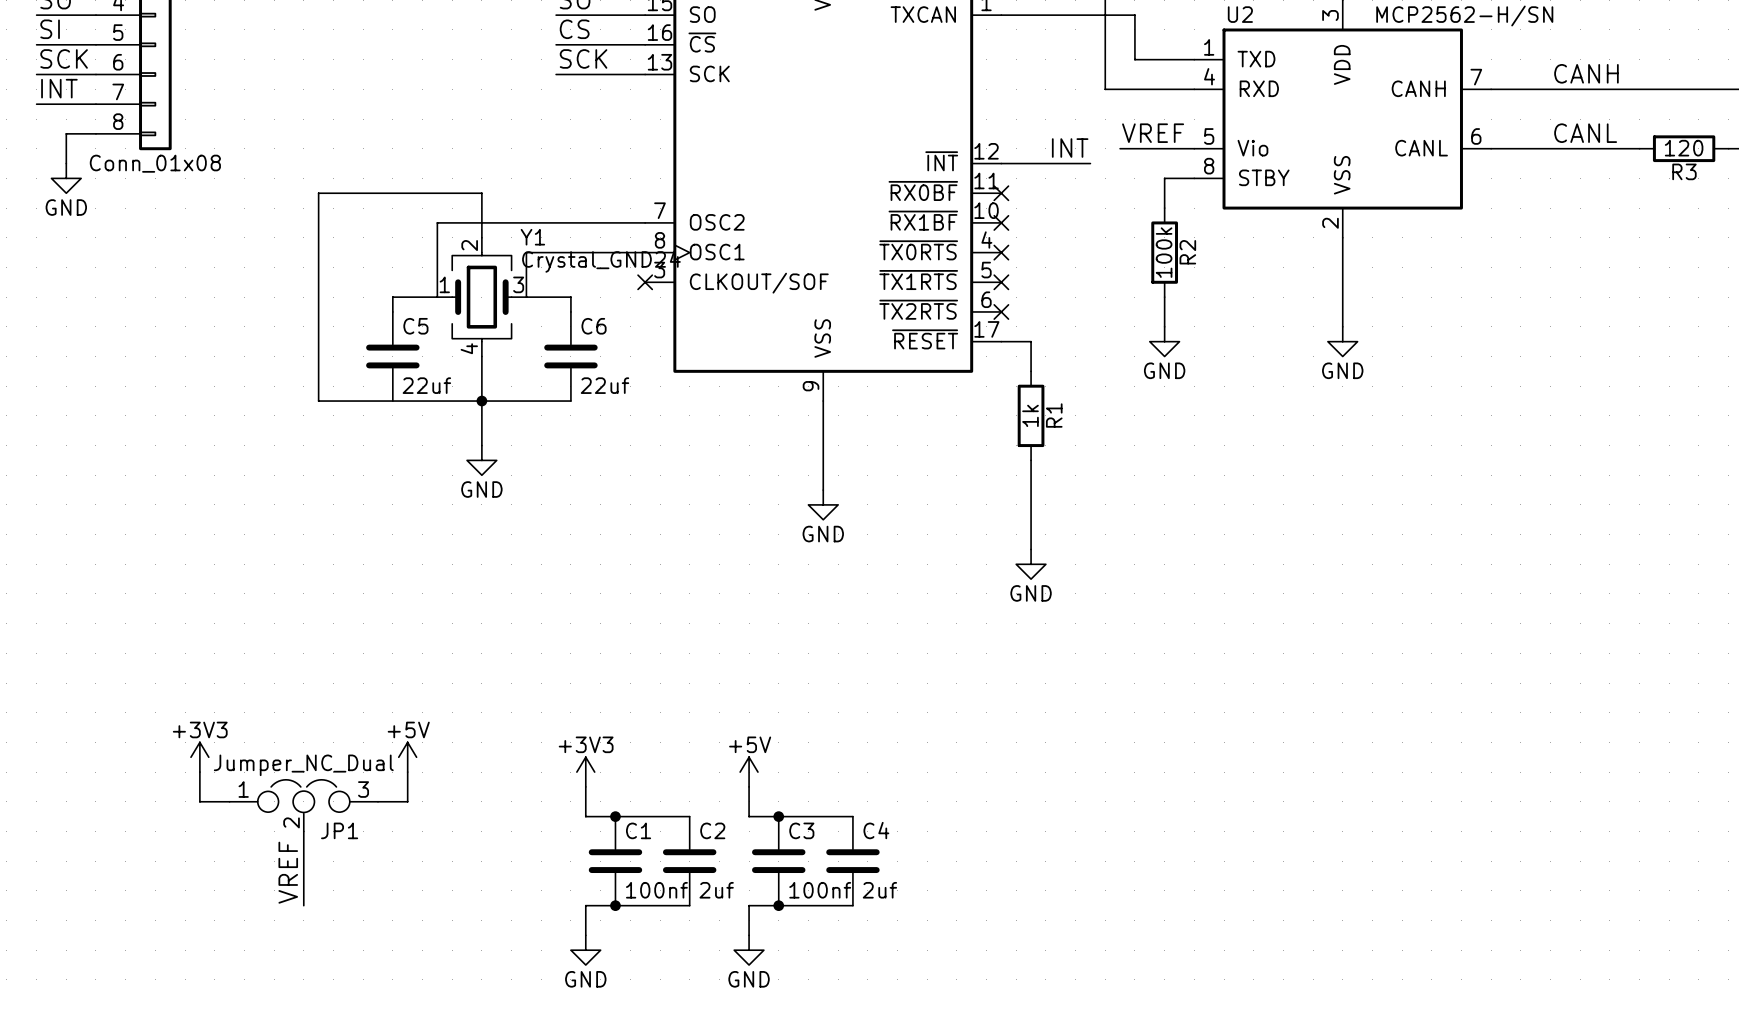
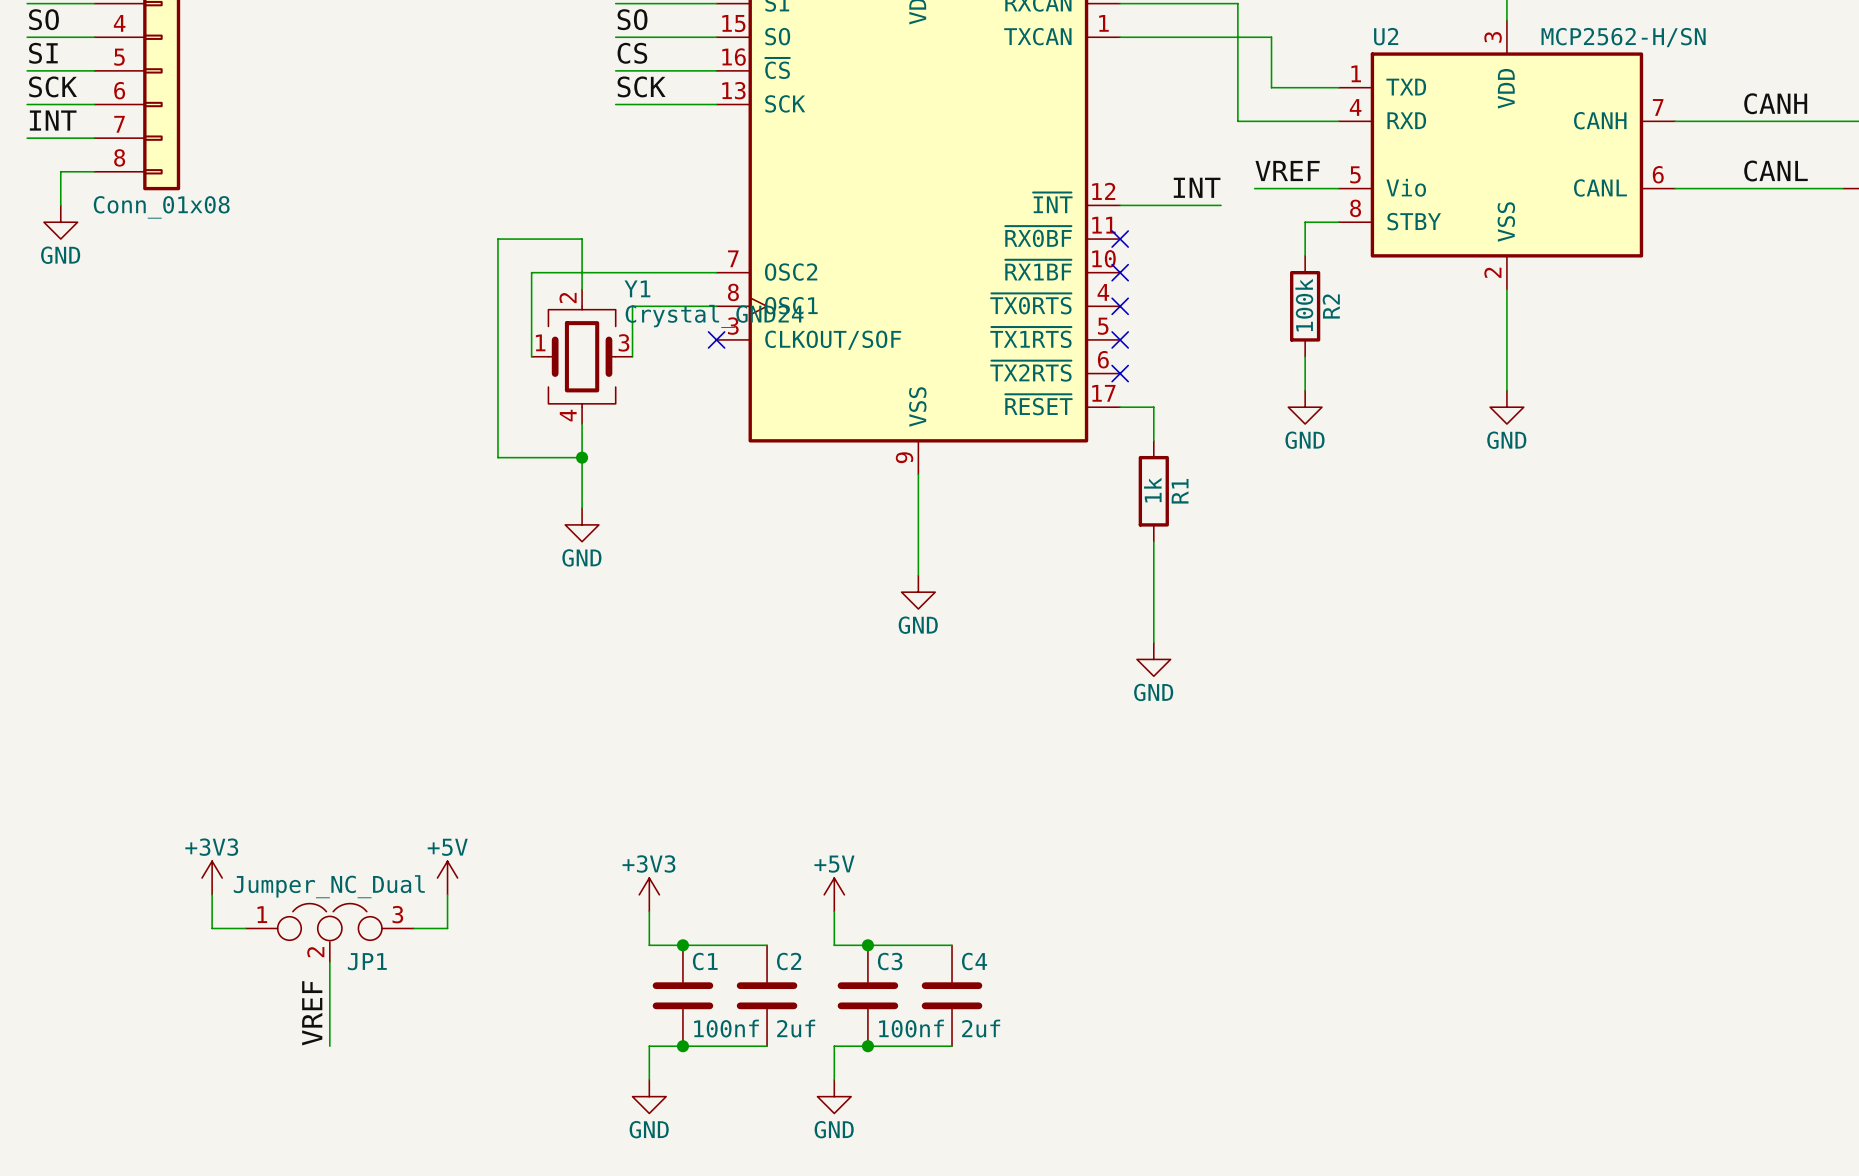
wire: (452, 193) (318, 193) (318, 401) (570, 401) -> (497, 239) (497, 457) (582, 457)
wire: (481, 193) (481, 222) (437, 222) (437, 297) (392, 297) (392, 311) -> (531, 239) (582, 239) (582, 289)
wire: none -> (531, 289) (531, 356)
wire: (570, 252) (526, 252) (526, 297) (570, 297) (570, 311) -> (632, 306) (632, 356)
Y1 position: (481, 297) -> (582, 356)
C5: 22uf (392, 356) -> none
wire: (481, 356) (481, 445) -> none
wire: none -> (582, 424) (582, 508)
C6: 22uf (570, 356) -> none
junction position: (481, 401) -> (582, 457)
power symbol position: GND (481, 460) -> GND (582, 524)

